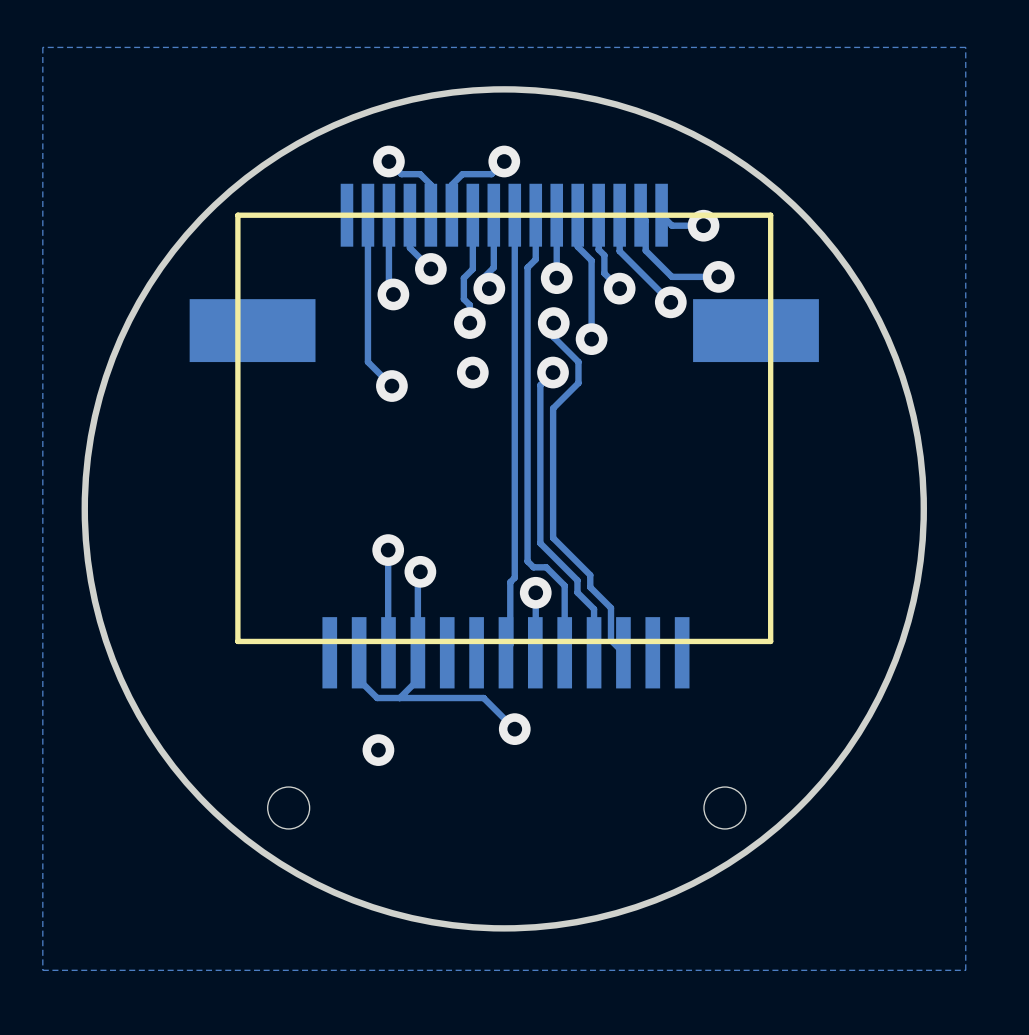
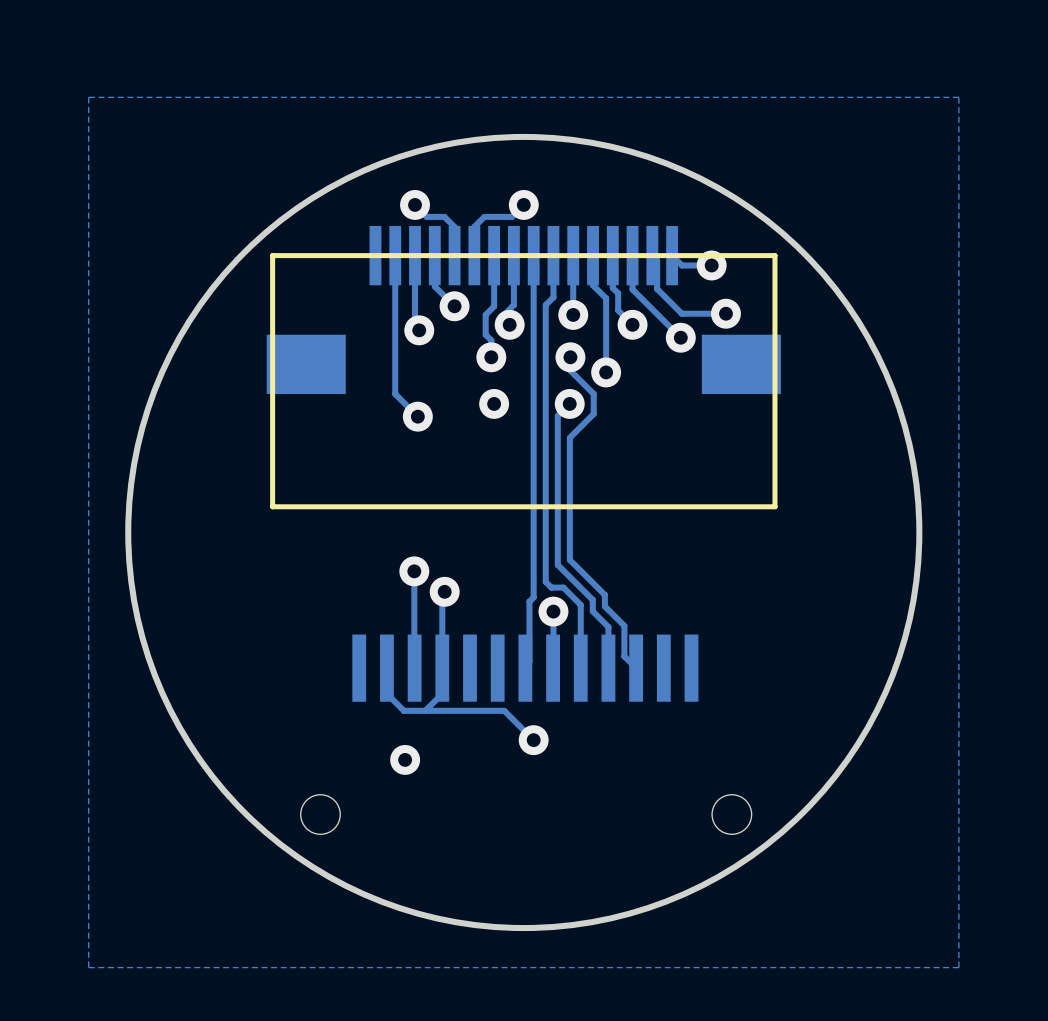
part: none -> (523, 367)
part: (504, 413) -> none

